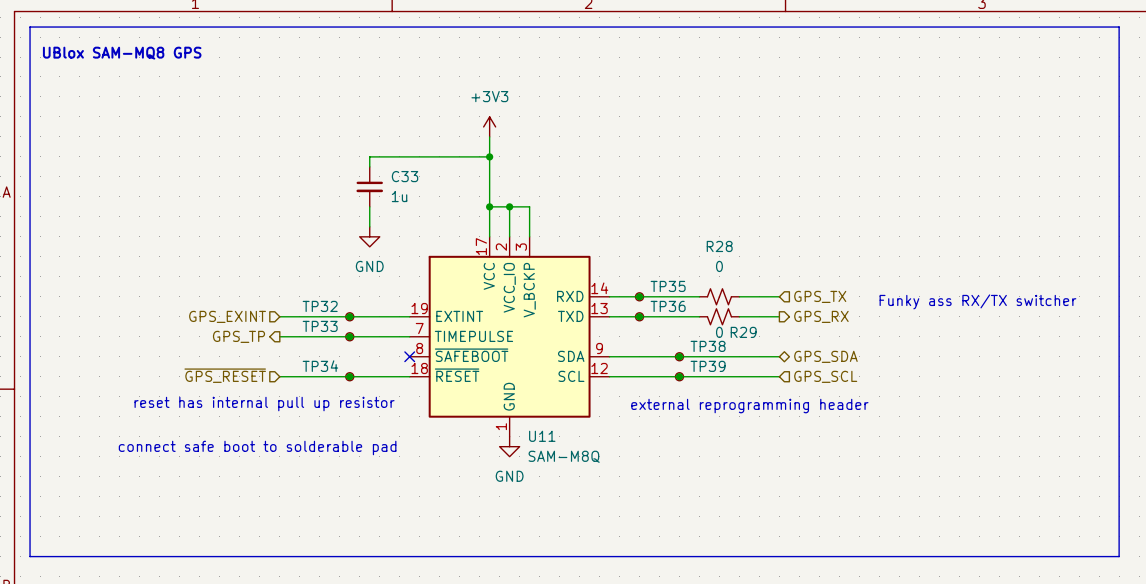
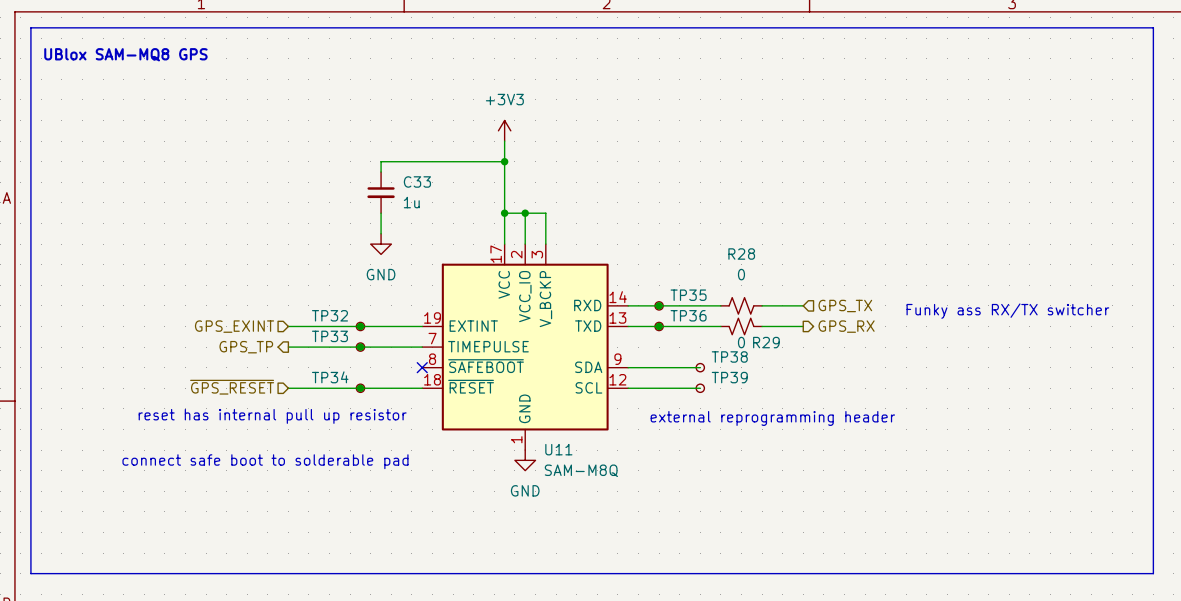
wire: (679, 356) (779, 356) -> none
junction: (679, 356) -> none
hierarchical label: GPS_SDA (825, 356) -> none
wire: (679, 376) (779, 376) -> none
junction: (679, 376) -> none
hierarchical label: GPS_SCL (825, 376) -> none

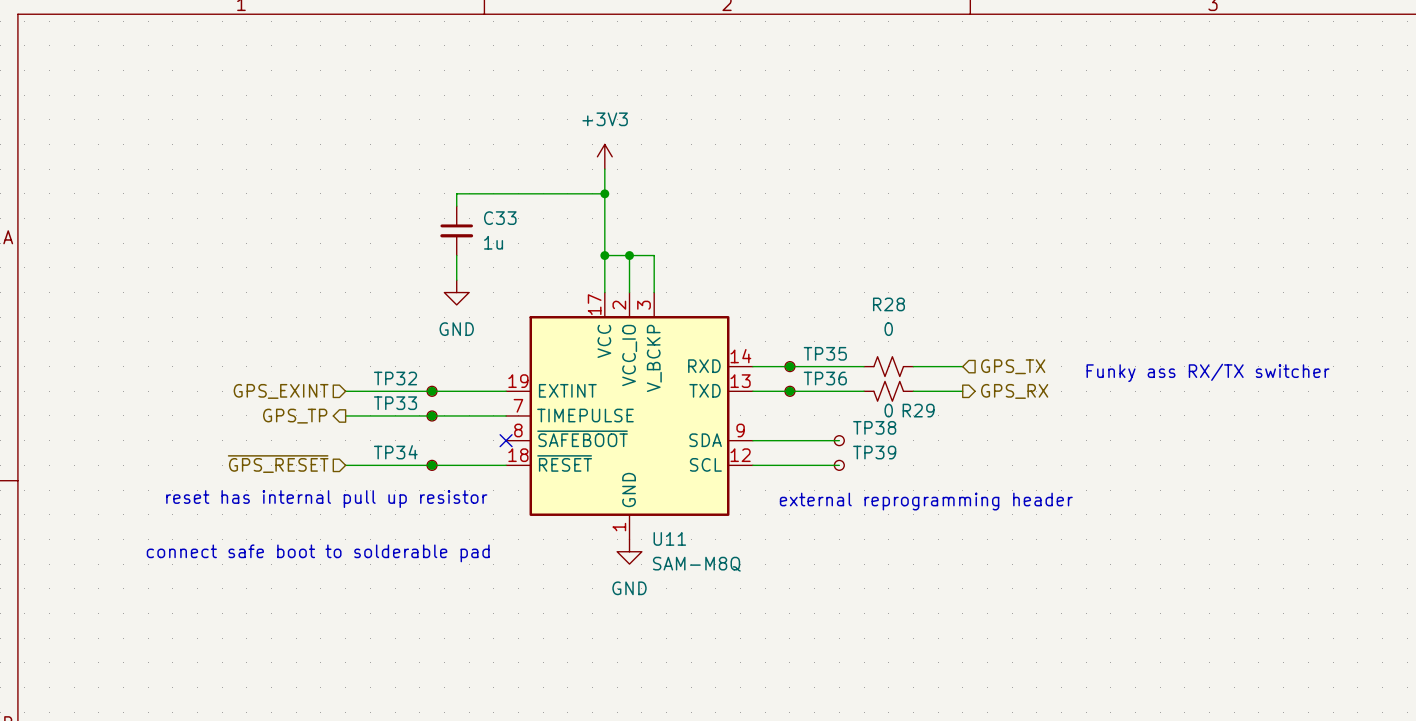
line: (30, 27) (1153, 27) (1153, 573) (30, 573) (30, 27) -> none
text: UBlox SAM-MQ8 GPS (125, 54) -> none

